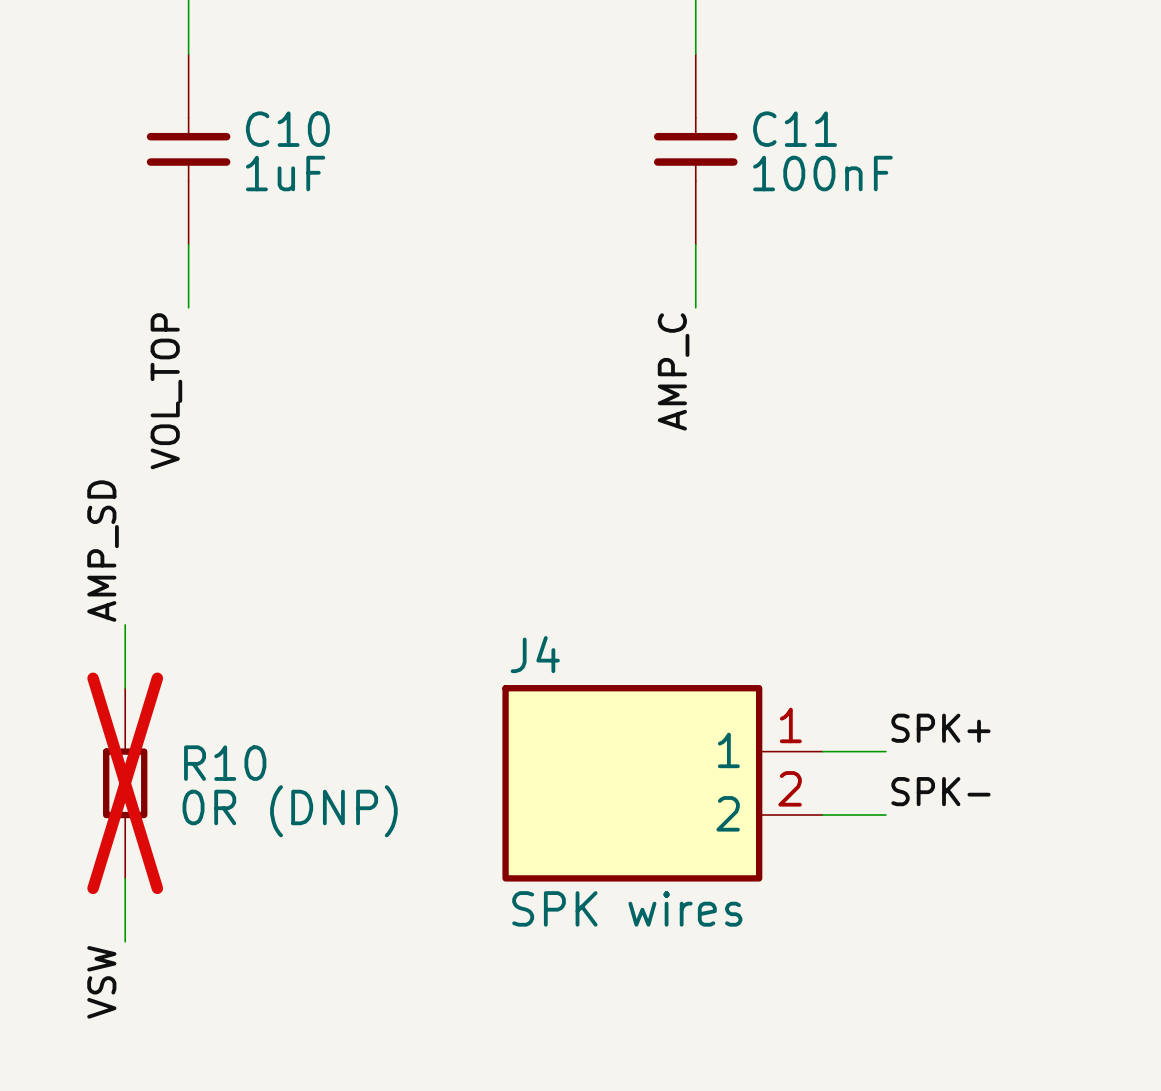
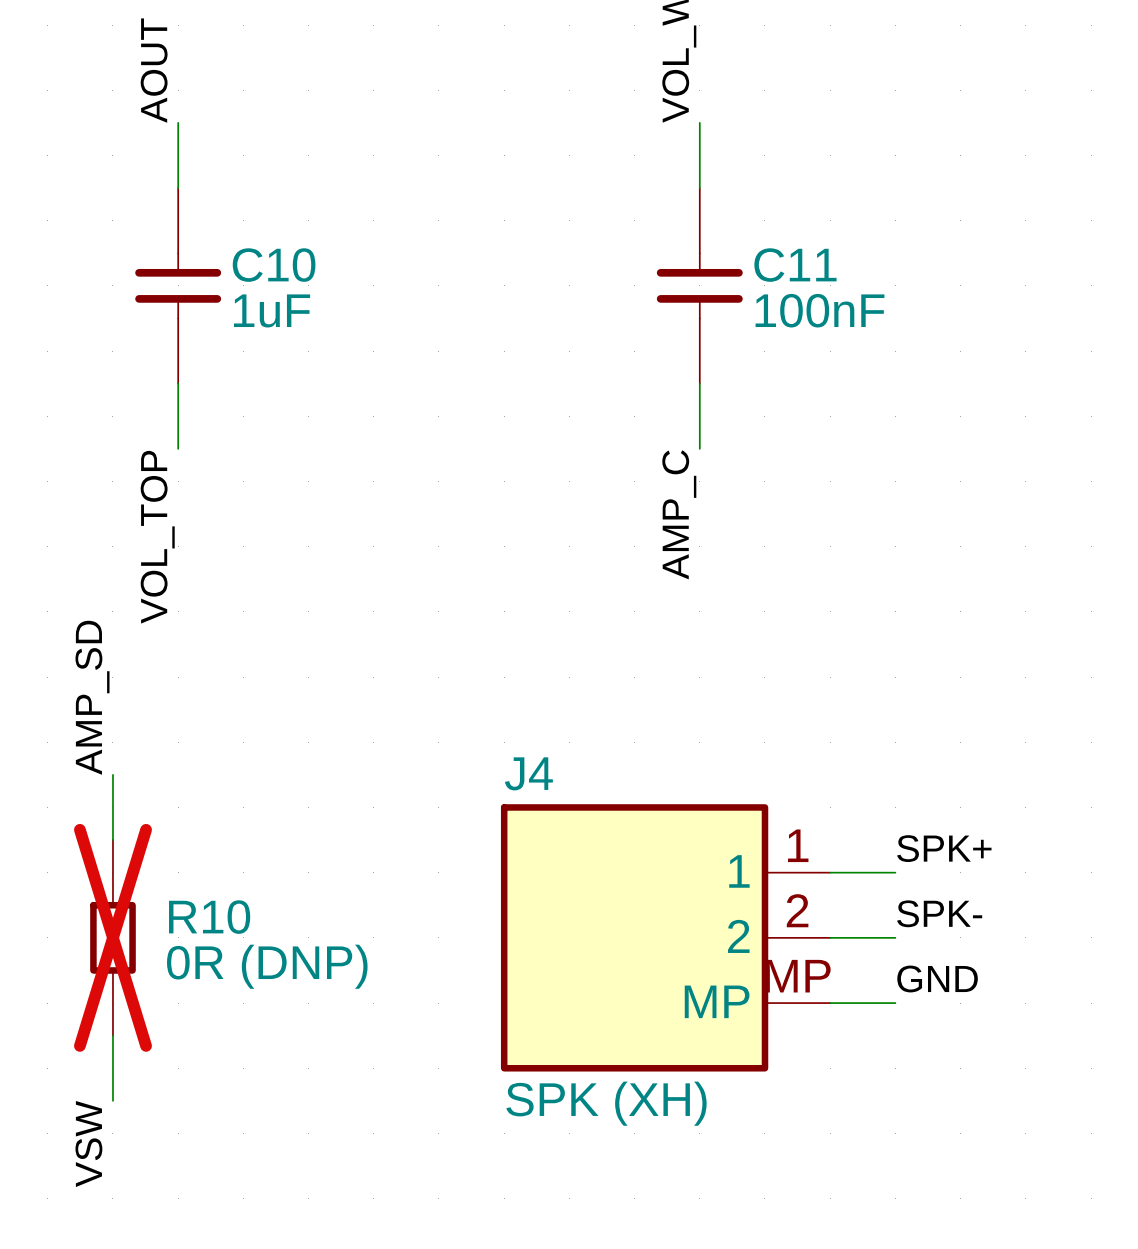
J4 symbol: [502, 685, 823, 882] -> [500, 804, 831, 1072]
label position: SPK+ (940, 728) -> SPK+ (944, 848)
wire: (822, 751) (885, 751) -> (830, 872) (895, 872)
label position: SPK- (940, 791) -> SPK- (939, 913)
wire: (822, 815) (885, 815) -> (830, 937) (895, 937)
label: none -> GND (937, 979)
wire: none -> (830, 1003) (895, 1003)
J4 value: SPK wires (627, 908) -> SPK (XH) (606, 1103)

